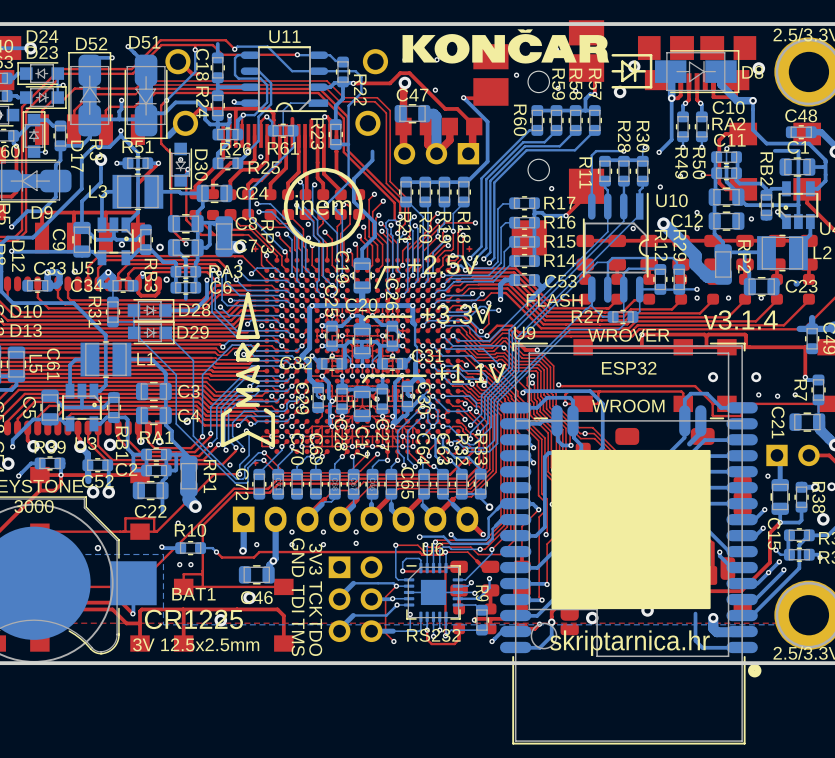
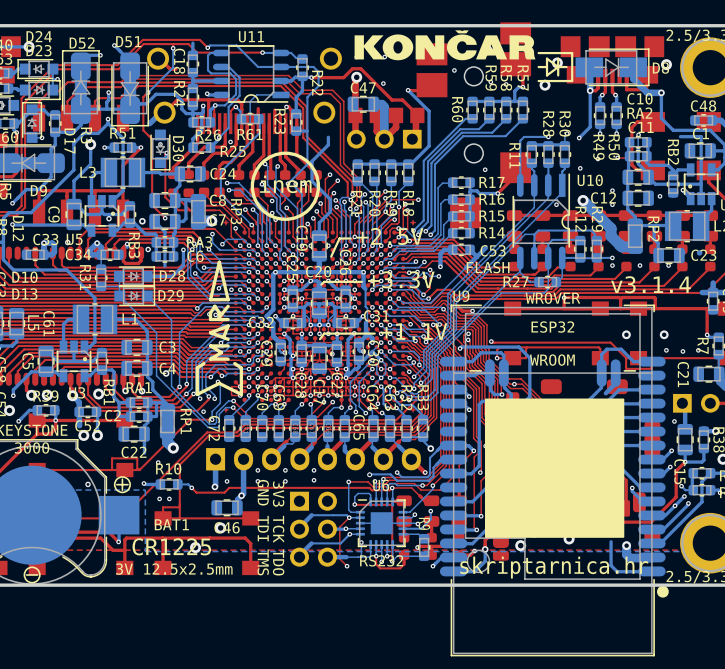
drawing: none -> [113, 476, 131, 494]
line: none -> (122, 479) (122, 490)
line: none -> (127, 484) (116, 484)
drawing: none -> [23, 566, 41, 584]
line: none -> (37, 574) (26, 574)

